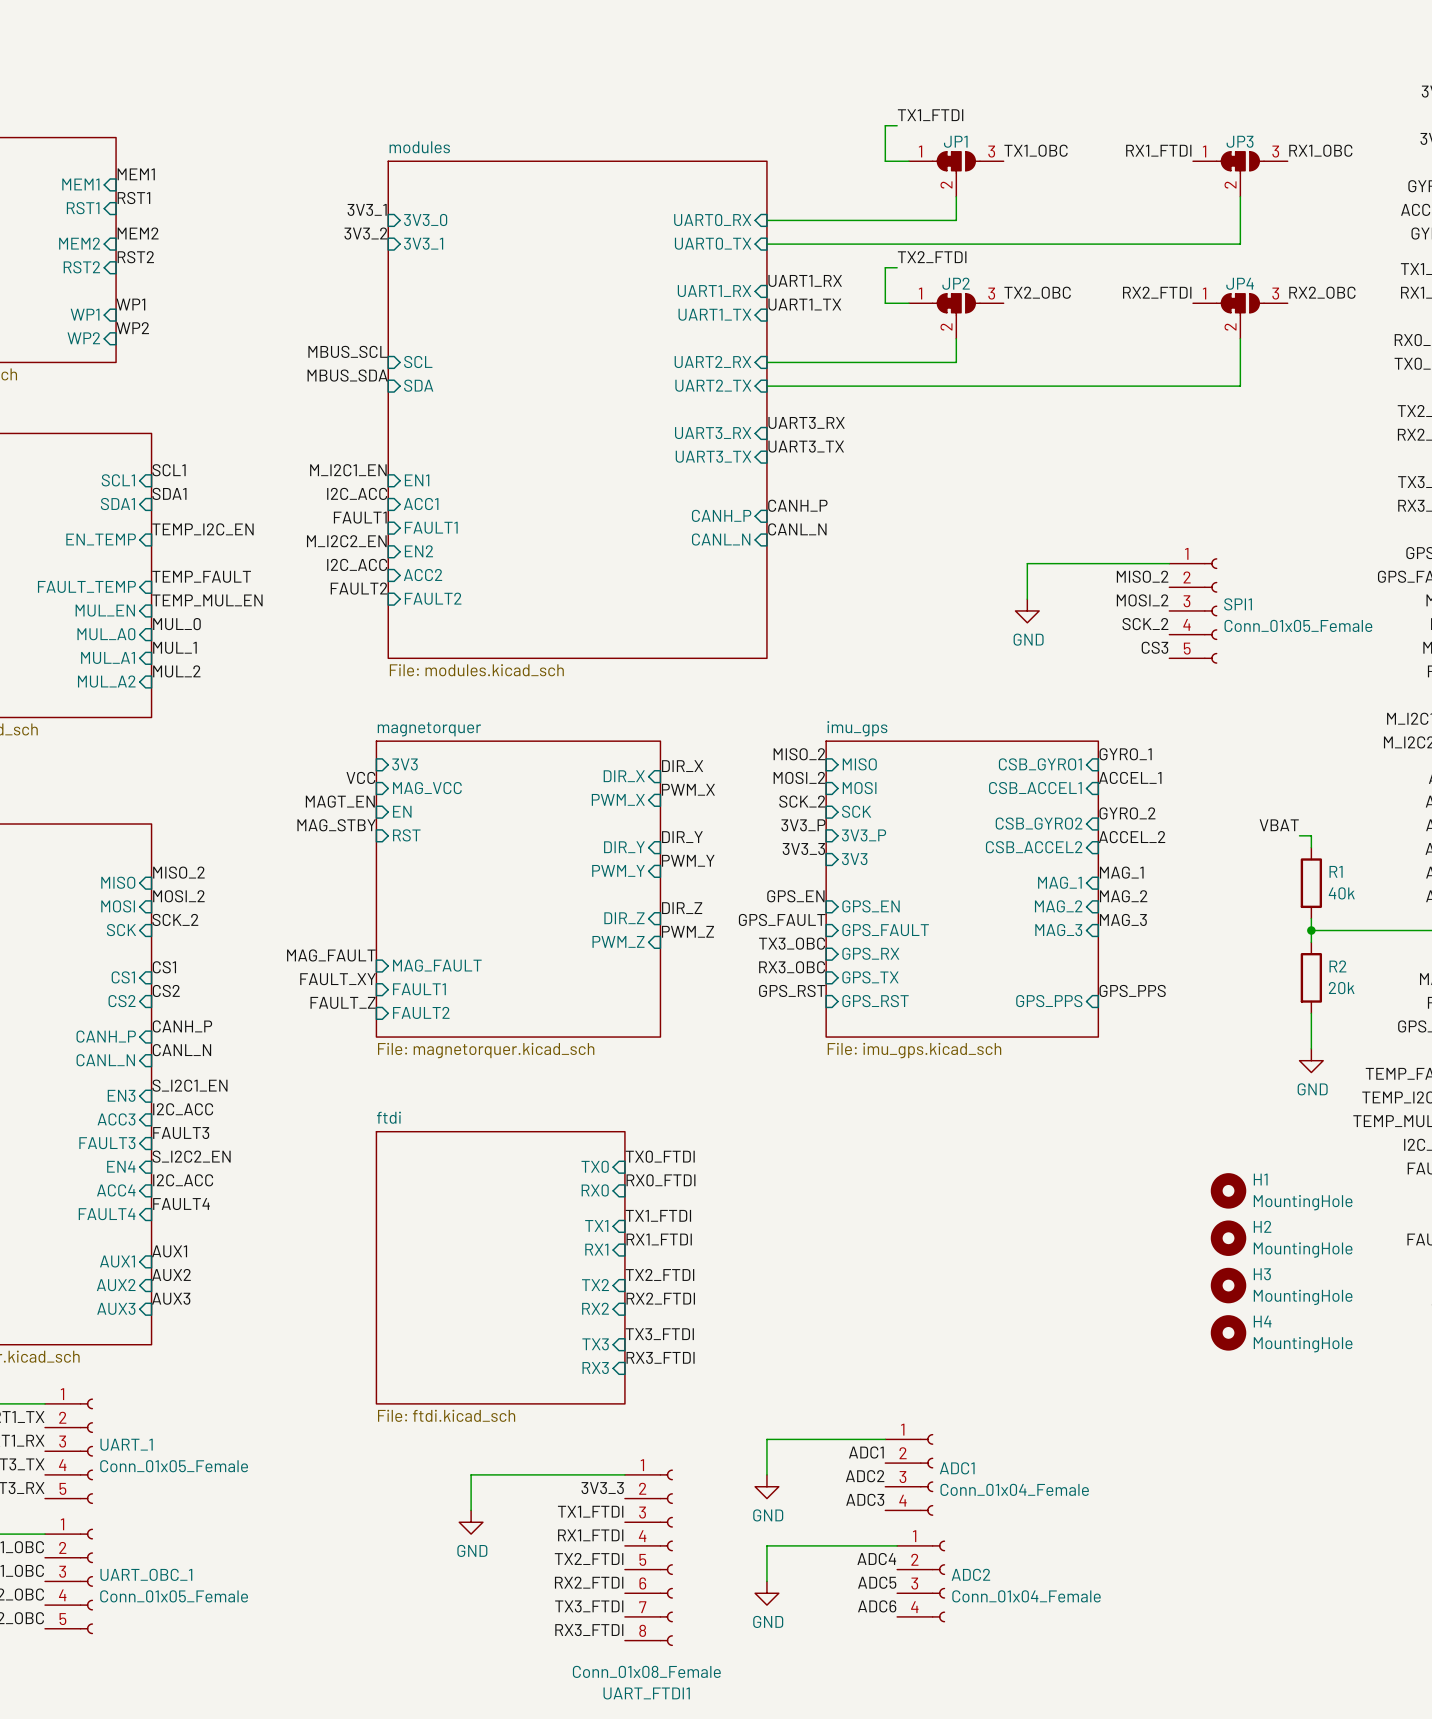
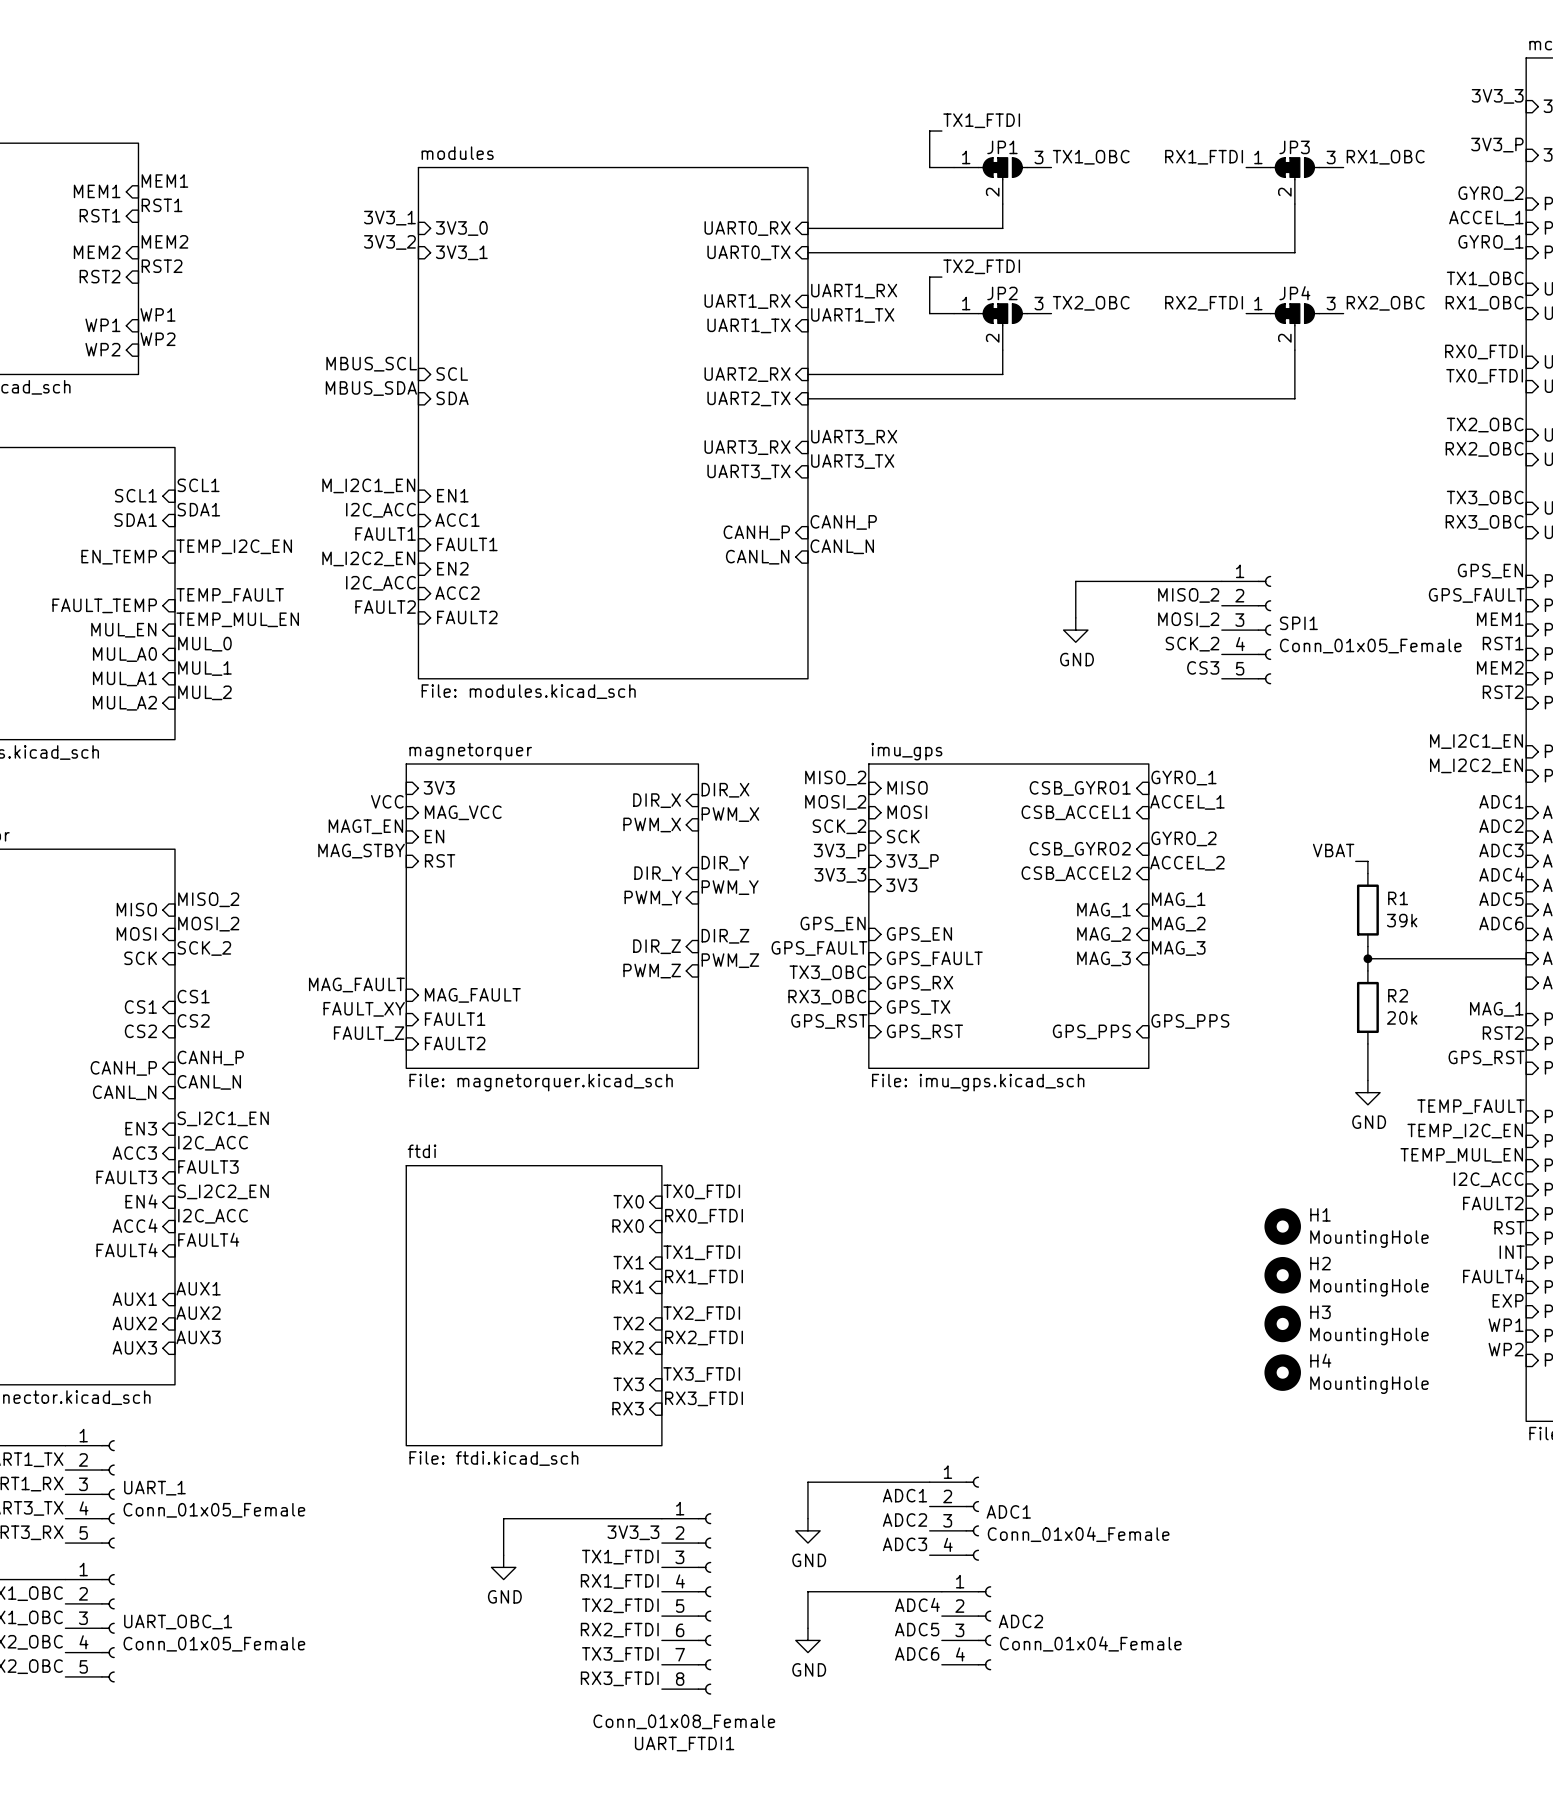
R1 value: 40k (1341, 893) -> 39k (1402, 920)

